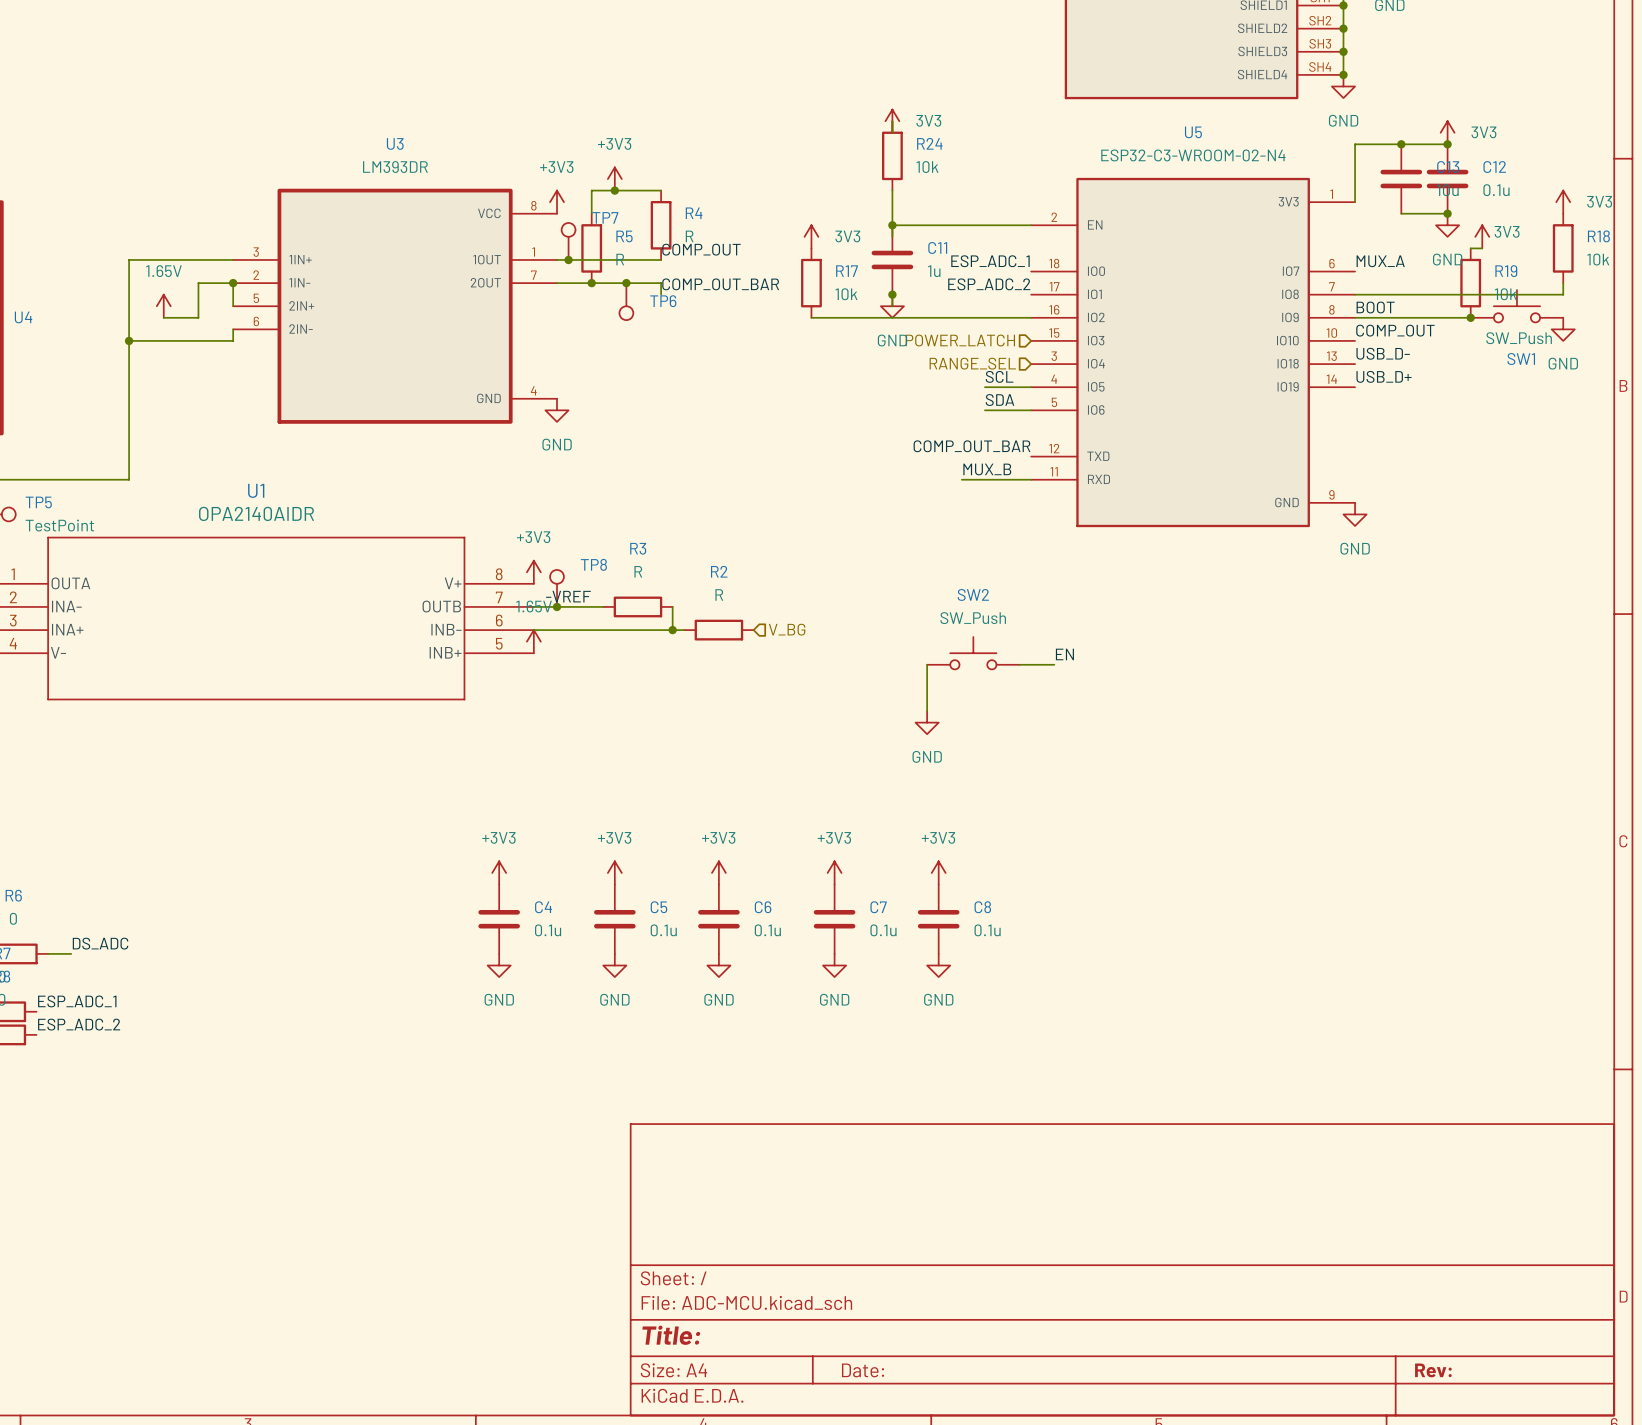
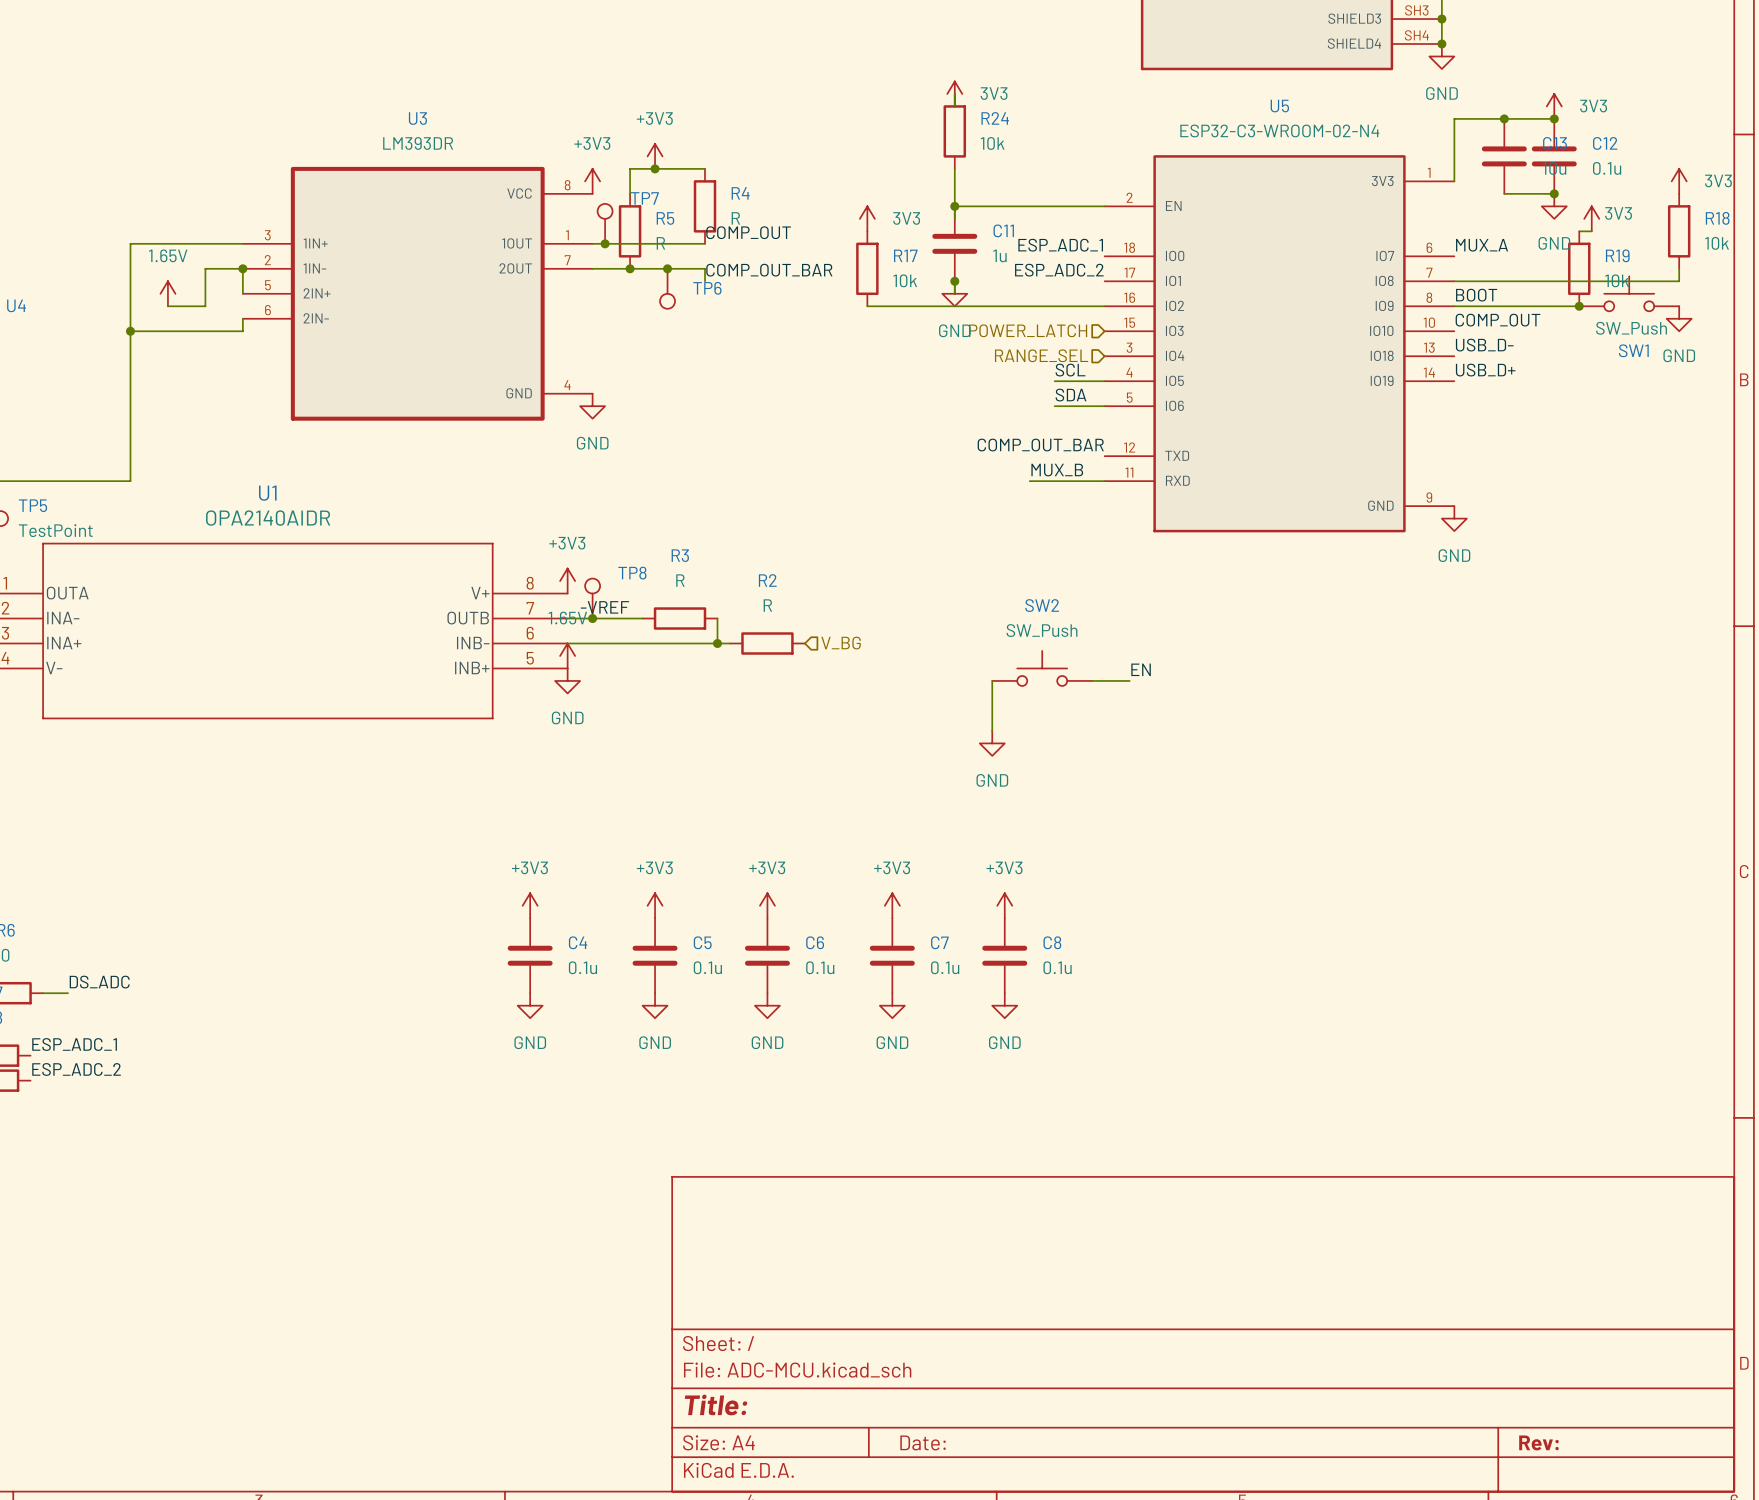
power symbol: none -> GND (567, 680)

